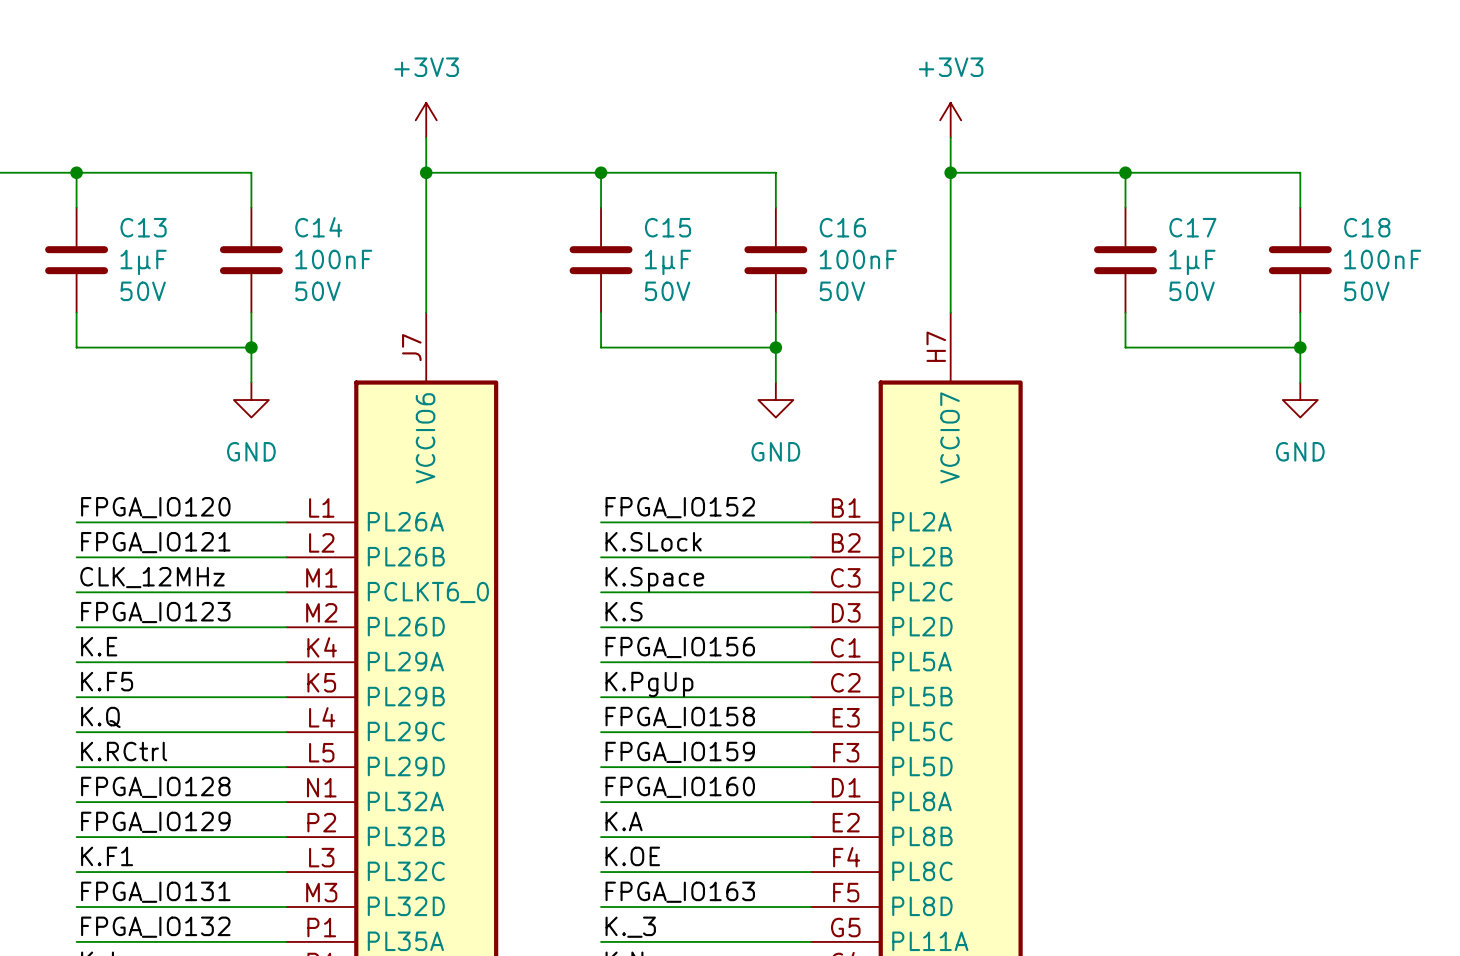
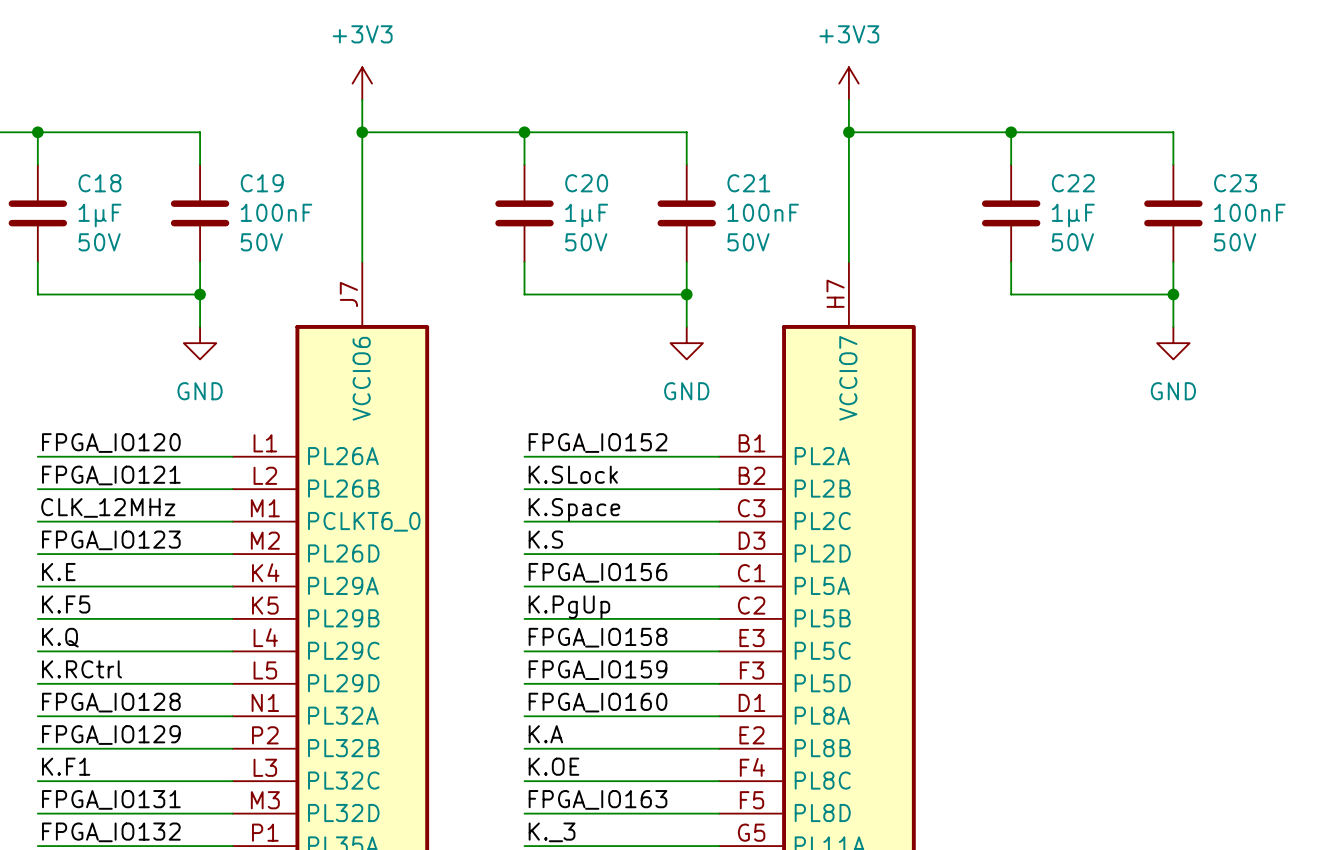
C13 name: C13 (143, 227) -> C18 (99, 183)
C14 name: C14 (318, 227) -> C19 (262, 183)
C15 name: C15 (668, 227) -> C20 (586, 183)
C16 name: C16 (842, 227) -> C21 (748, 183)
C17 name: C17 (1192, 227) -> C22 (1073, 183)
C18 name: C18 (1367, 227) -> C23 (1235, 183)

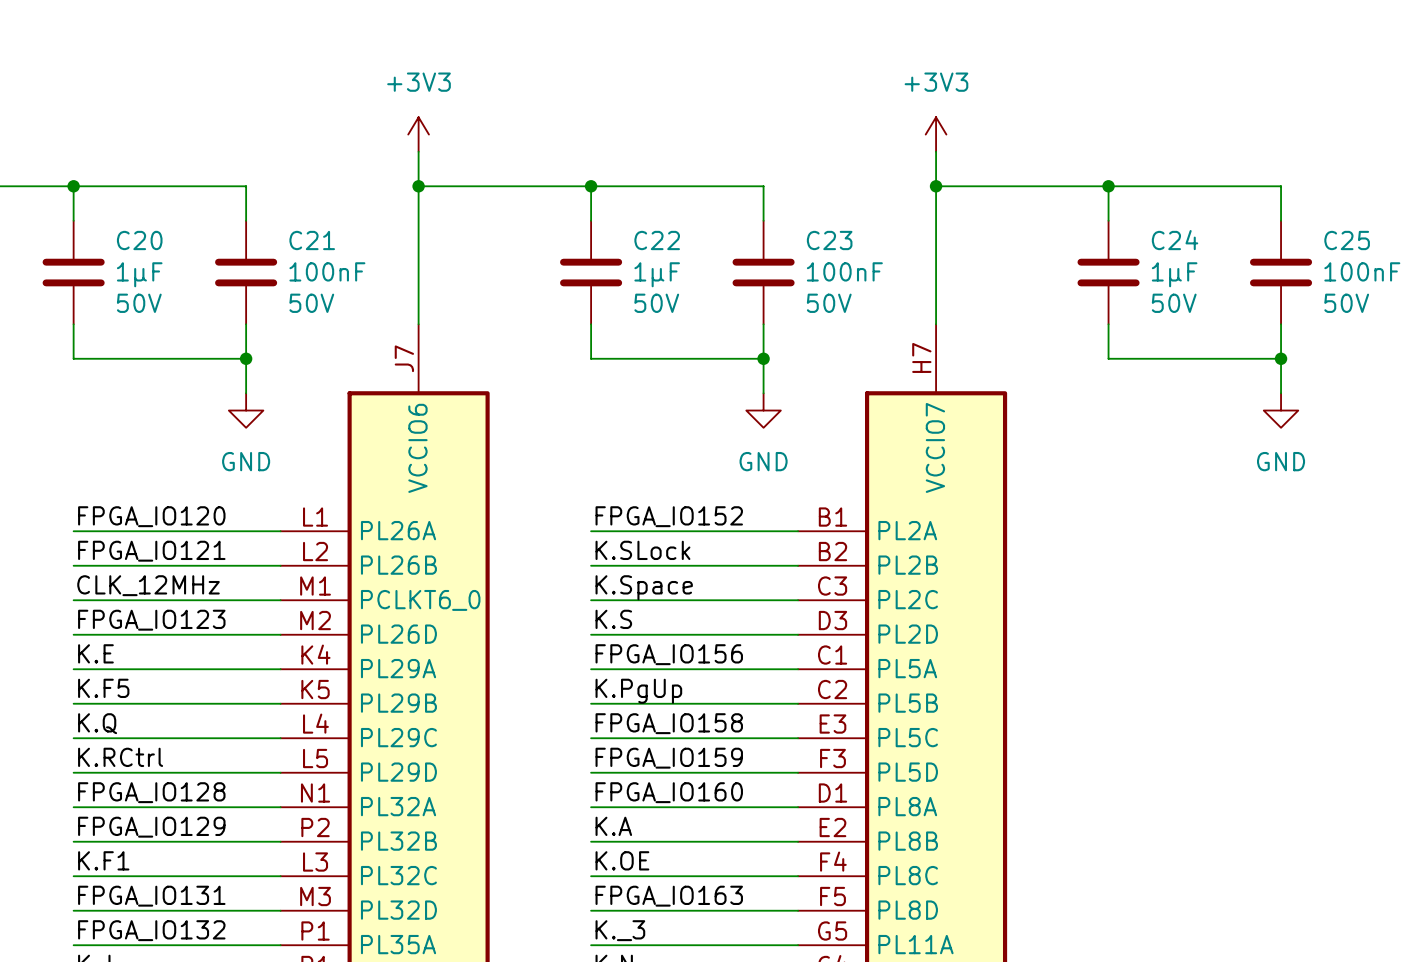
C18 name: C18 (99, 183) -> C20 (139, 240)
C19 name: C19 (262, 183) -> C21 (312, 240)
C20 name: C20 (586, 183) -> C22 (657, 240)
C21 name: C21 (748, 183) -> C23 (829, 240)
C22 name: C22 (1073, 183) -> C24 (1175, 240)
C23 name: C23 (1235, 183) -> C25 (1347, 240)

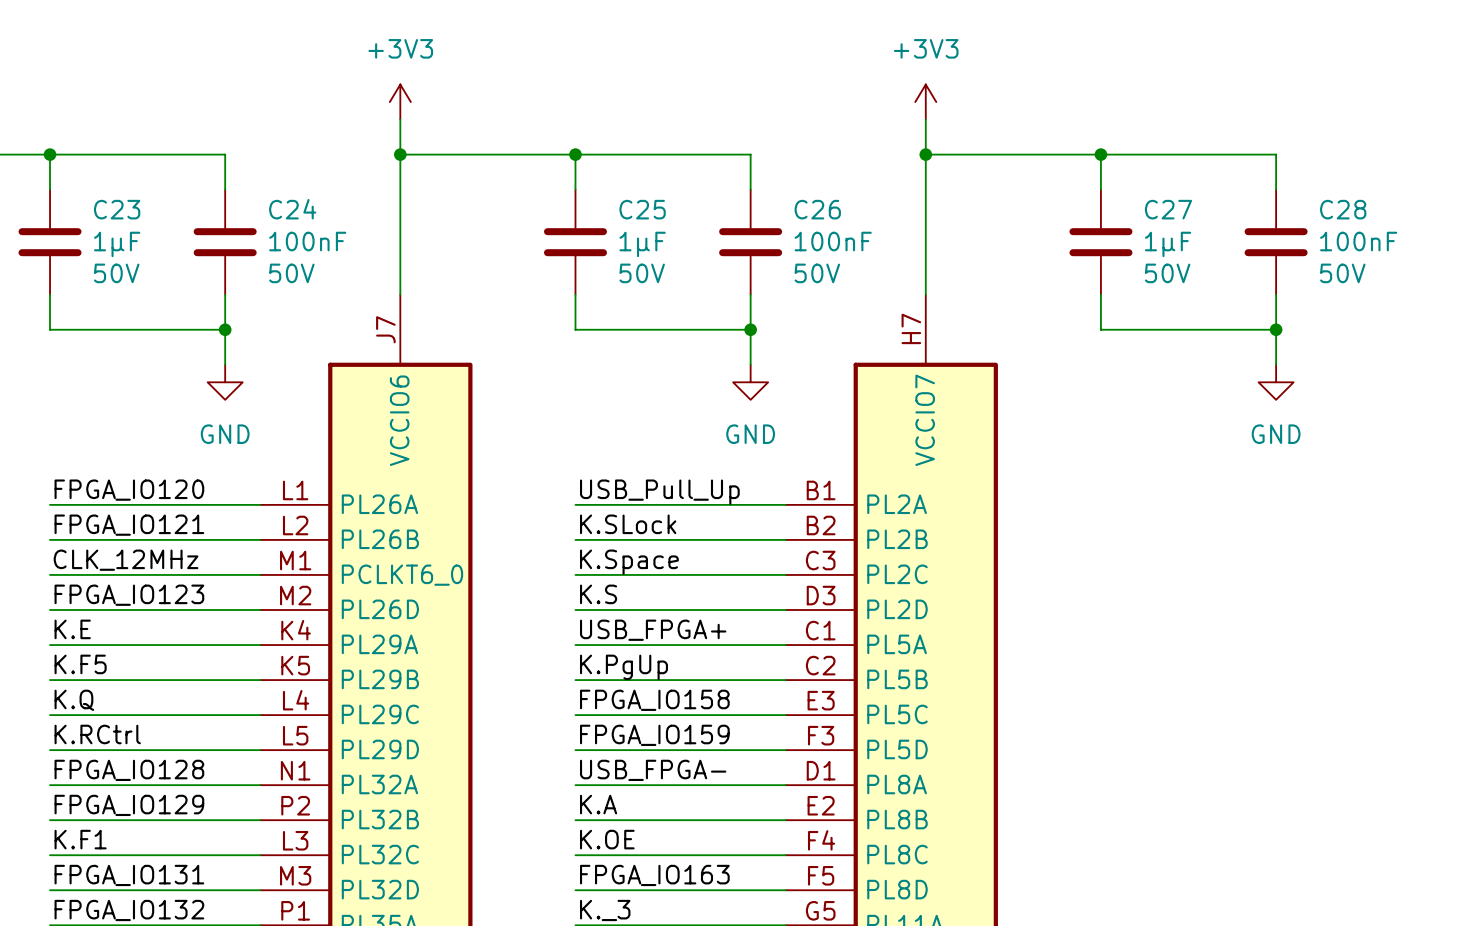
C20 name: C20 (139, 240) -> C23 (117, 209)
C21 name: C21 (312, 240) -> C24 (292, 209)
C22 name: C22 (657, 240) -> C25 (642, 209)
C23 name: C23 (829, 240) -> C26 (817, 209)
C24 name: C24 (1175, 240) -> C27 (1168, 209)
C25 name: C25 (1347, 240) -> C28 (1343, 209)
label: FPGA_IO152 (669, 516) -> USB_Pull_Up (659, 492)
label: FPGA_IO156 (669, 654) -> USB_FPGA+ (653, 630)
label: FPGA_IO160 (669, 792) -> USB_FPGA- (653, 770)

